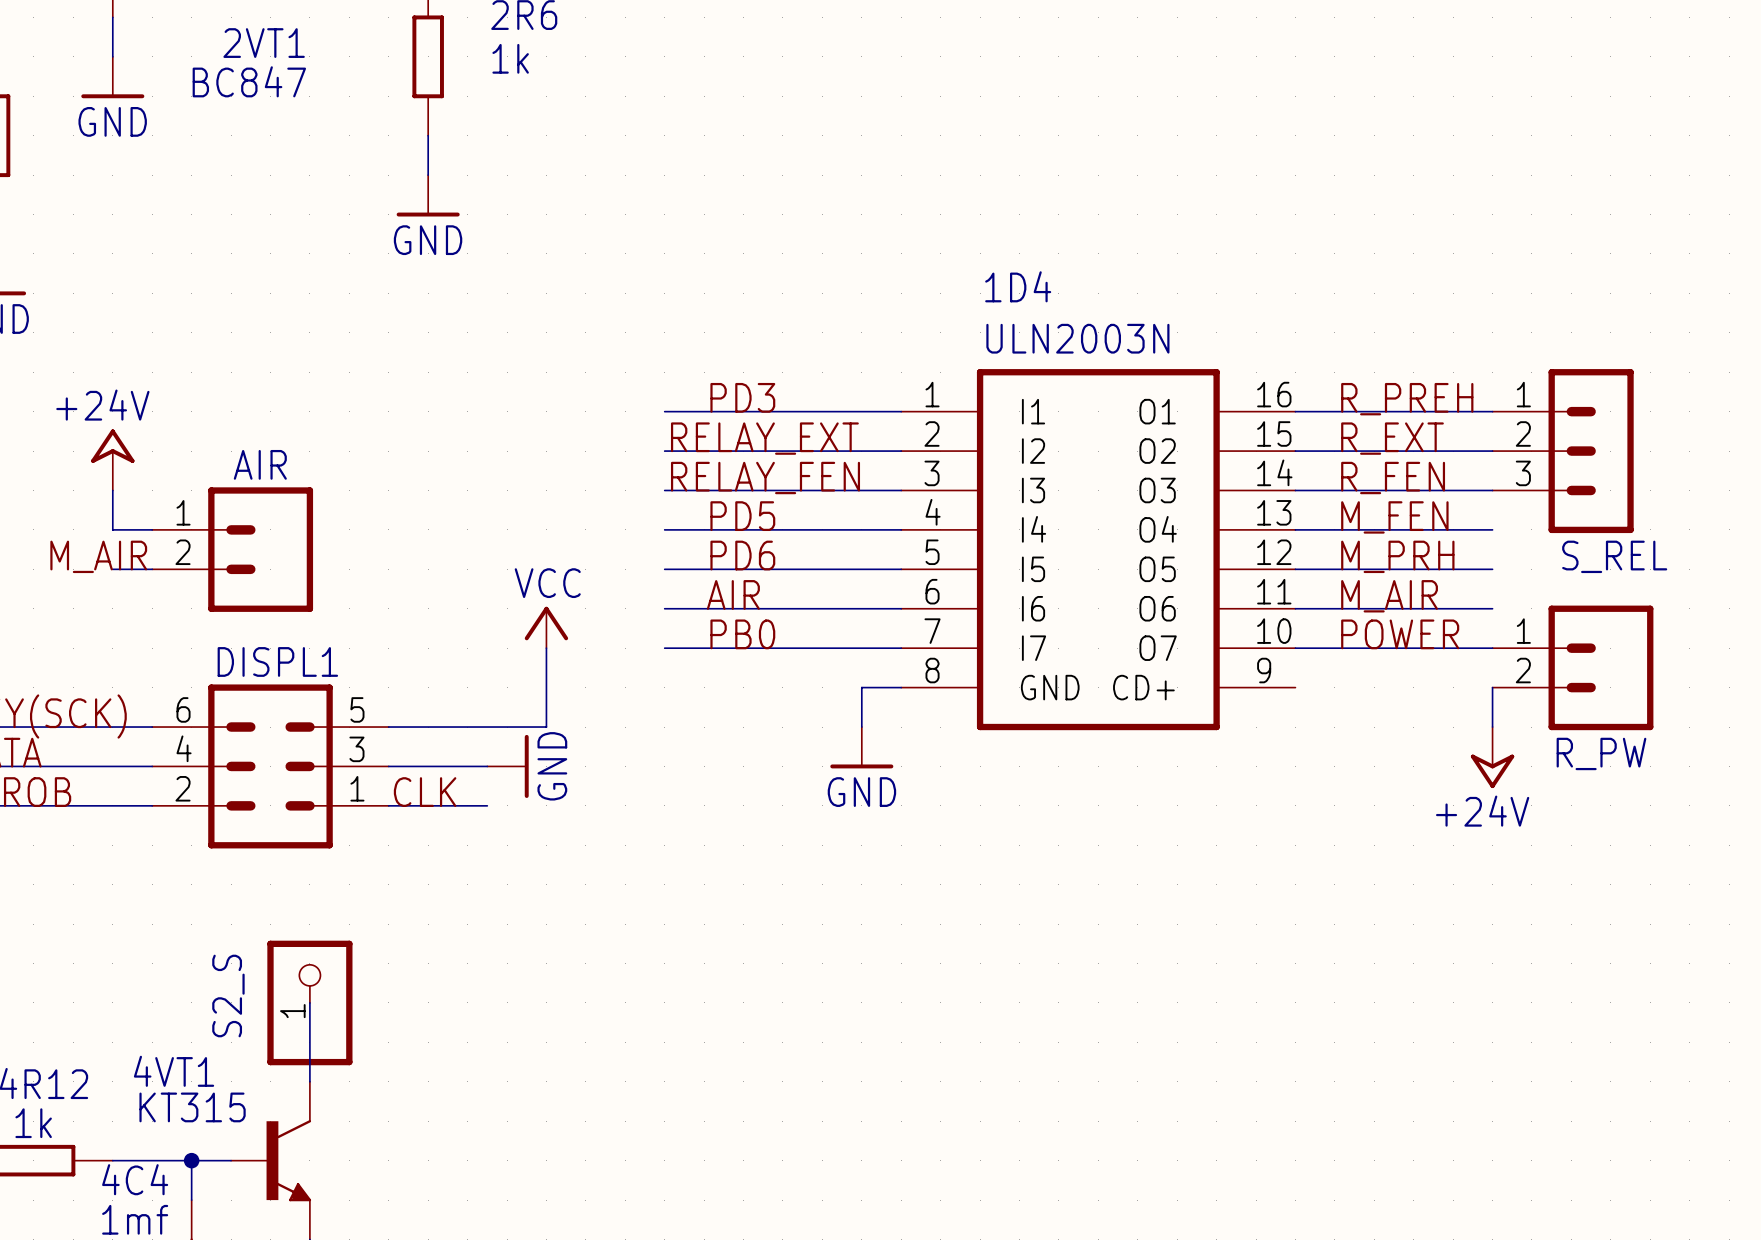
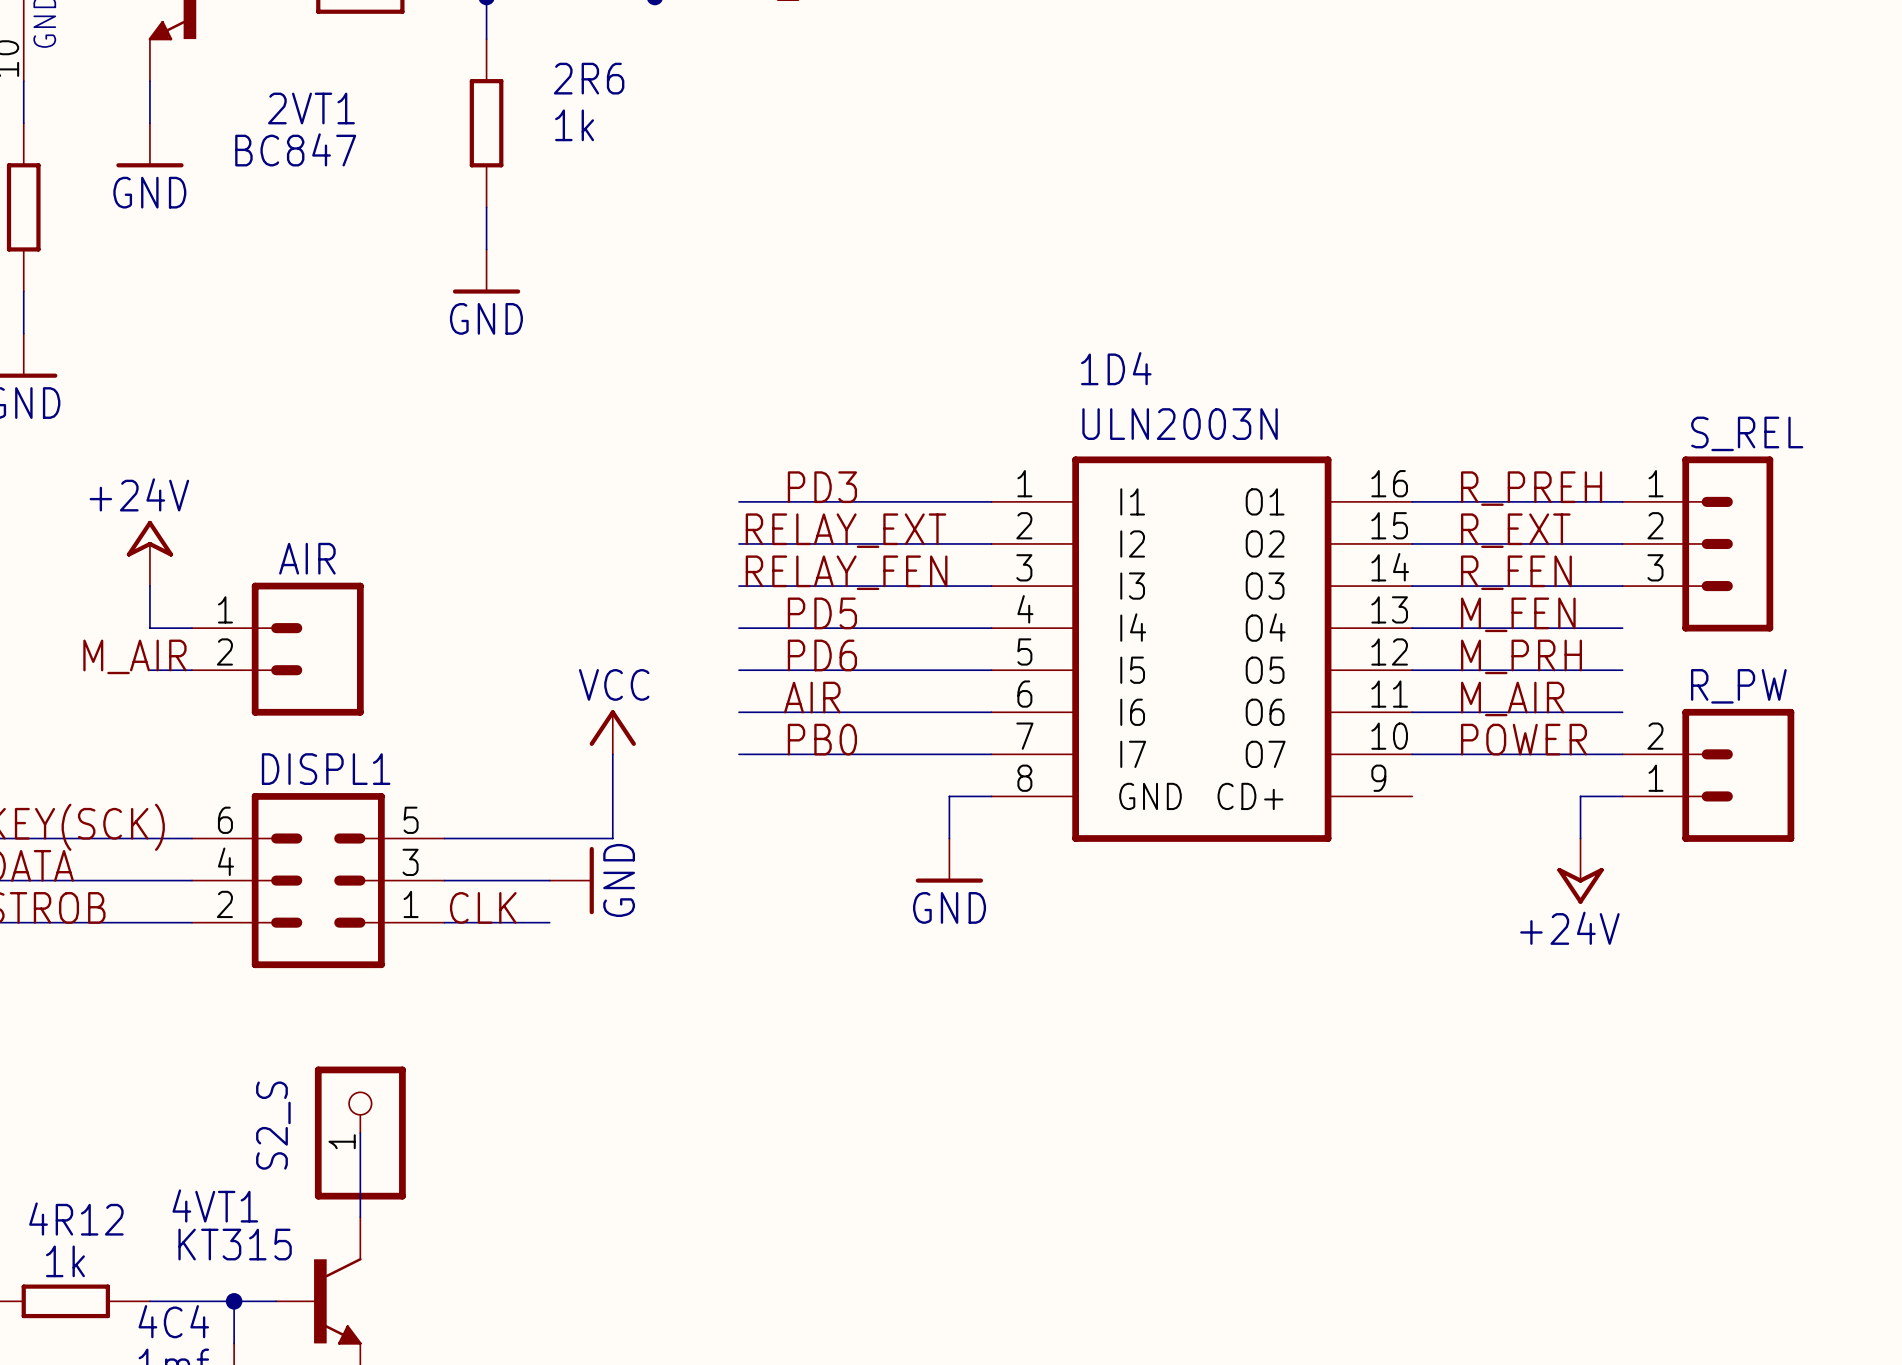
S_REL name position: S_REL (1614, 556) -> S_REL (1747, 433)
R_PW flip: as is (1600, 667) -> up-down (1738, 775)
wire: (1492, 687) (1492, 727) -> (1622, 796) (1580, 796) (1580, 838)
power symbol position: +24V (1492, 757) -> +24V (1580, 871)

